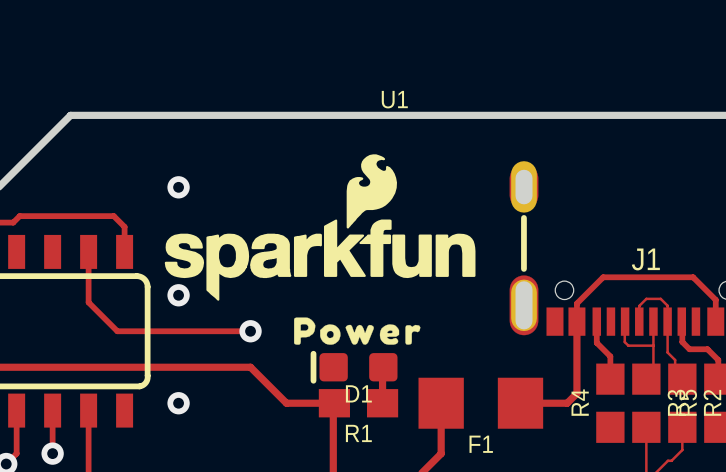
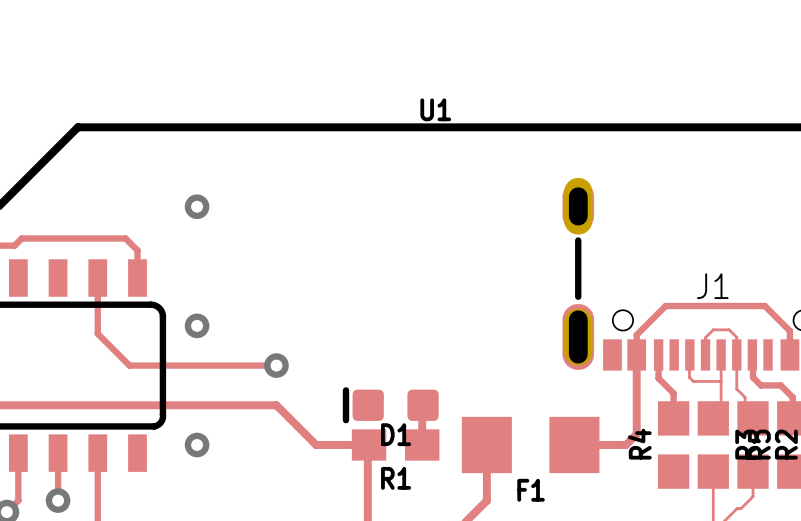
drawing: [164, 154, 476, 345] -> none

